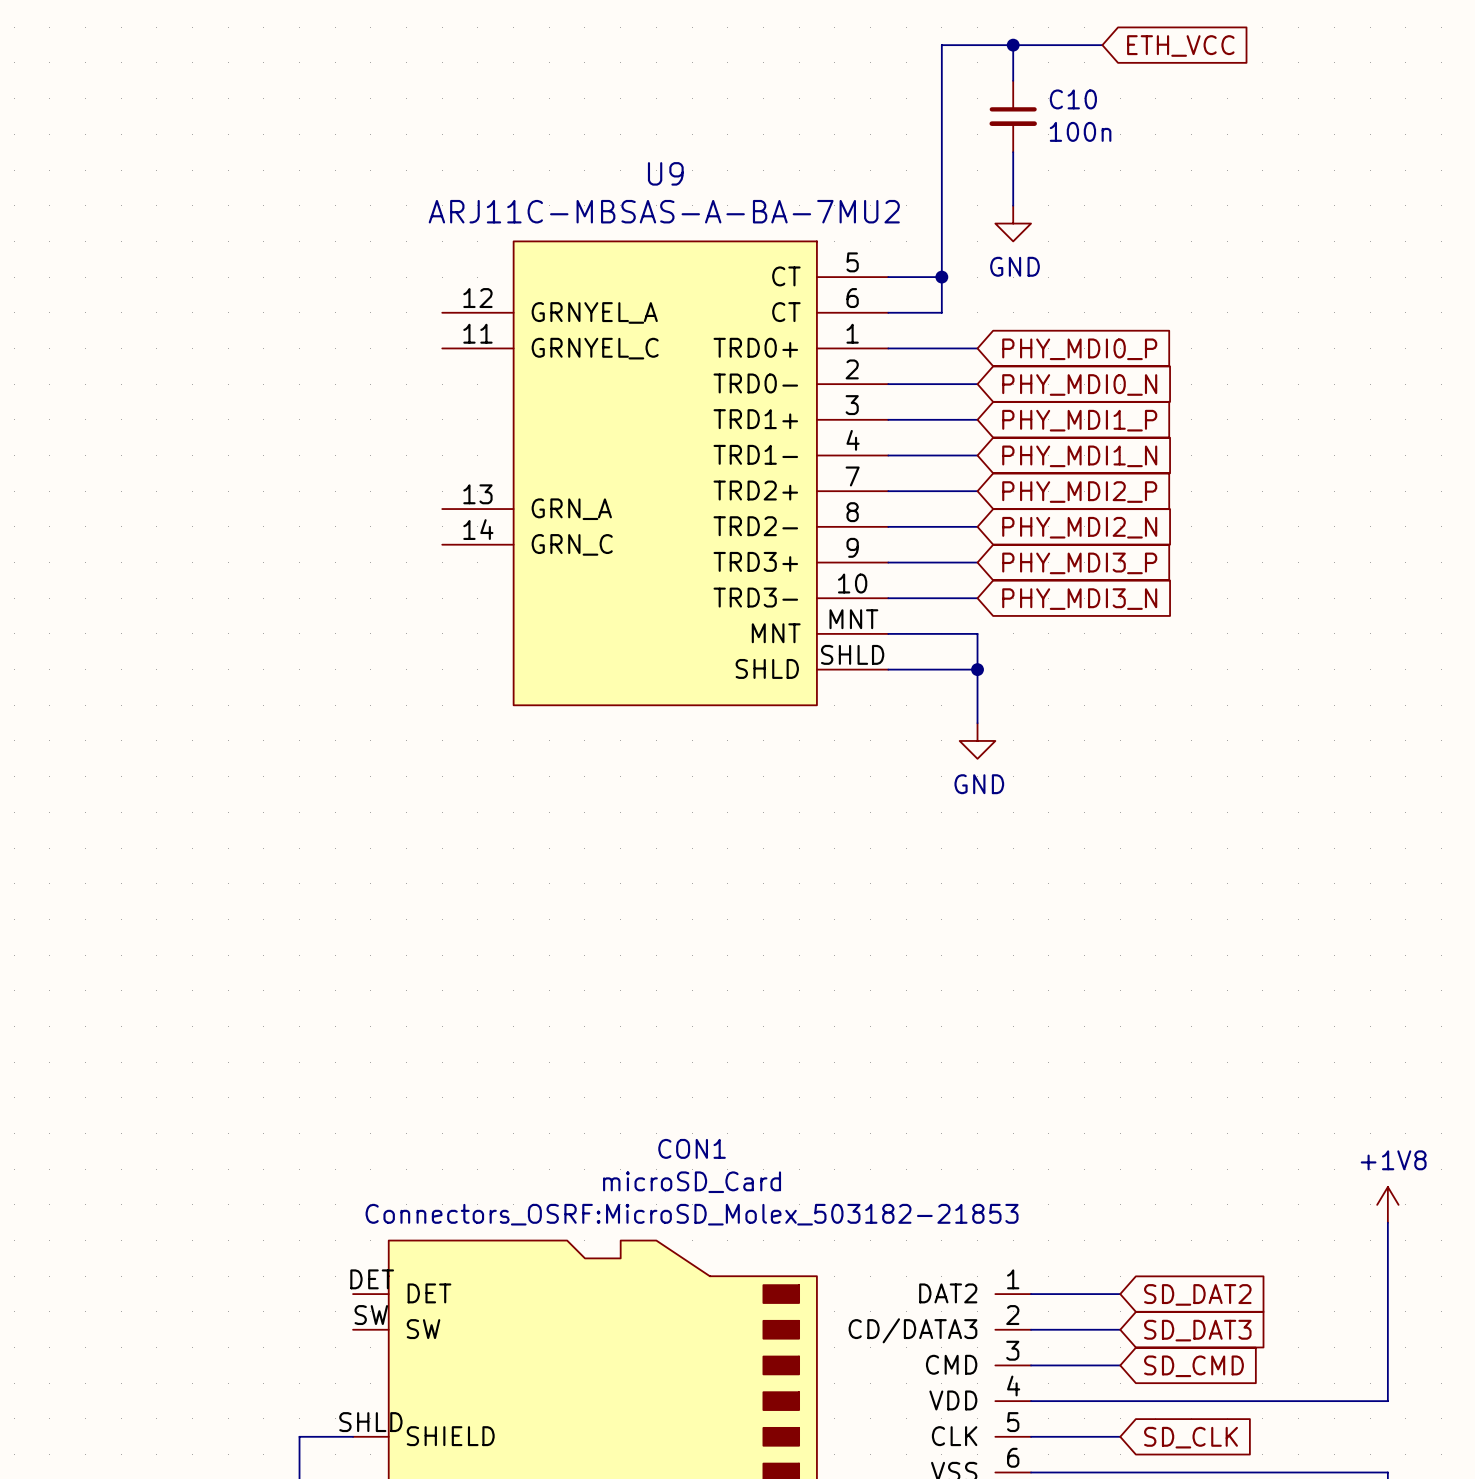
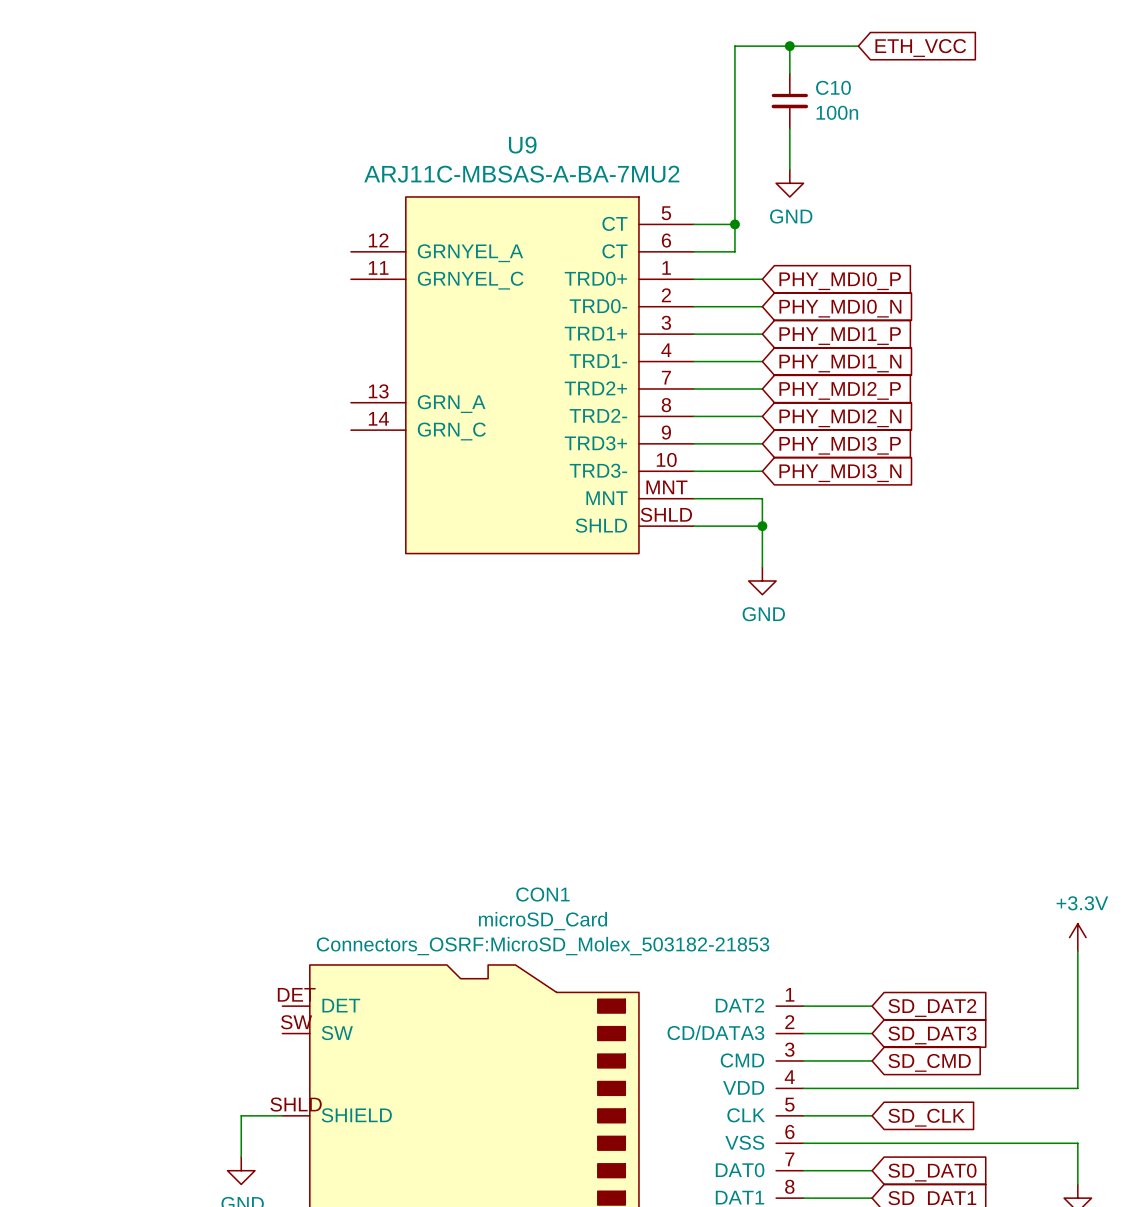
power symbol: +1V8 (1387, 1204) -> +3.3V (1077, 937)

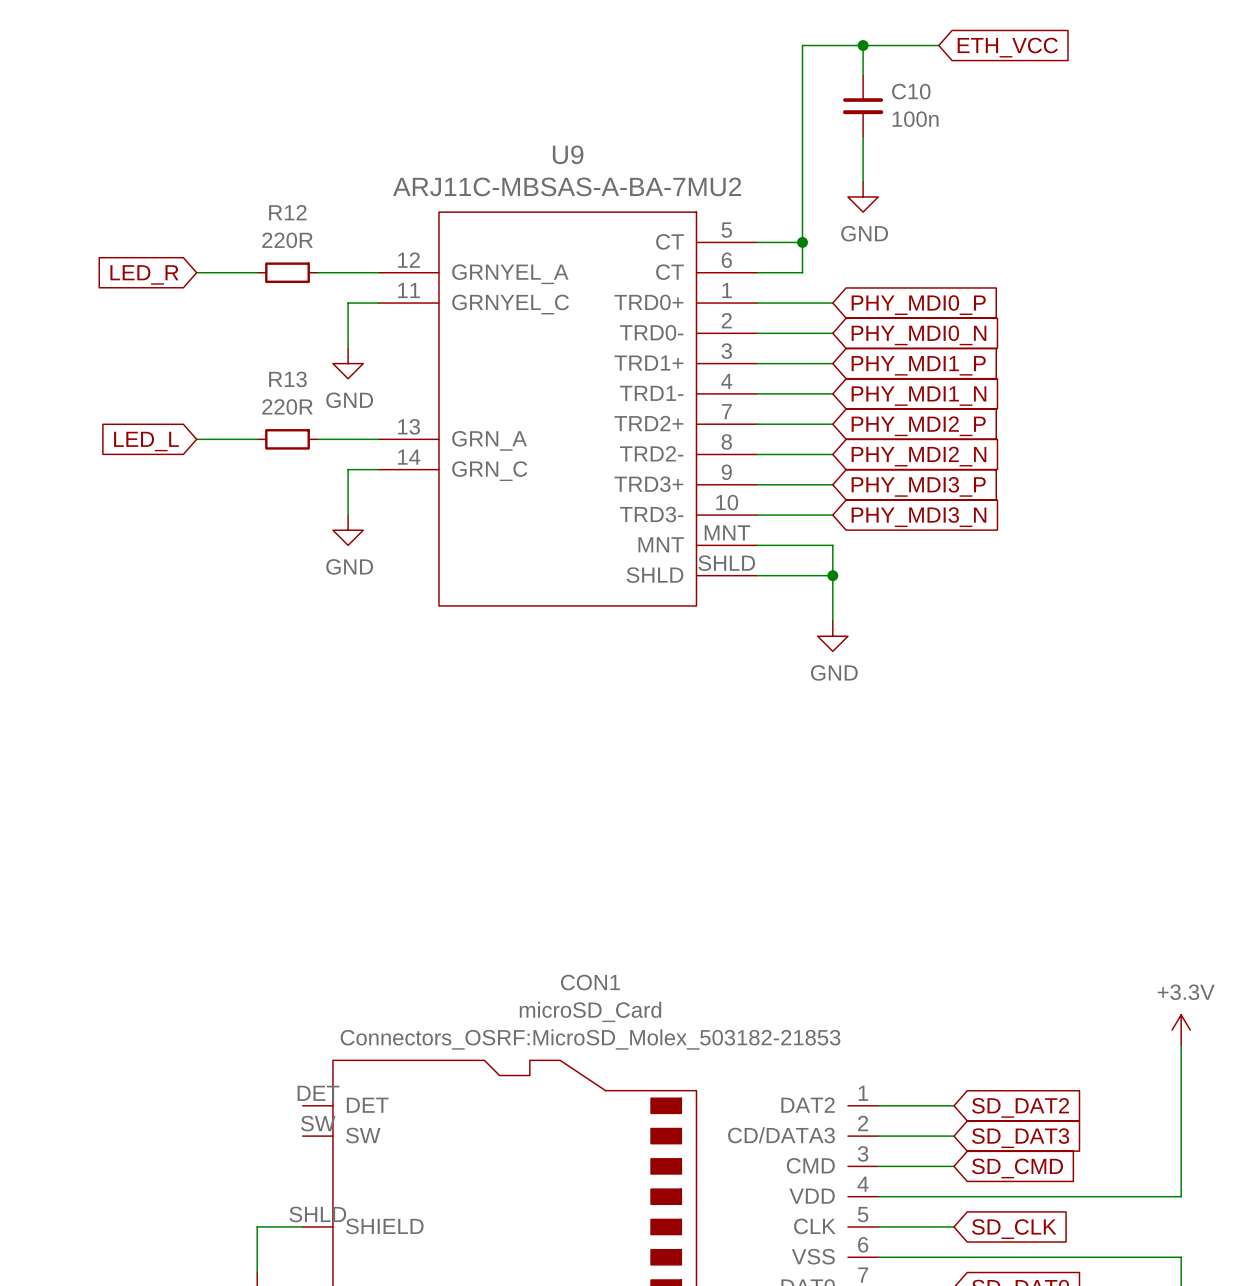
wire: none -> (196, 272) (257, 272)
R12: none -> 220R (287, 272)
wire: none -> (317, 272) (378, 272)
global label: none -> LED_R (144, 274)
wire: none -> (378, 303) (348, 303) (348, 348)
power symbol: none -> GND (348, 363)
wire: none -> (196, 439) (257, 439)
R13: none -> 220R (287, 439)
wire: none -> (317, 439) (378, 439)
global label: none -> LED_L (146, 441)
wire: none -> (378, 469) (348, 469) (348, 515)
power symbol: none -> GND (348, 530)

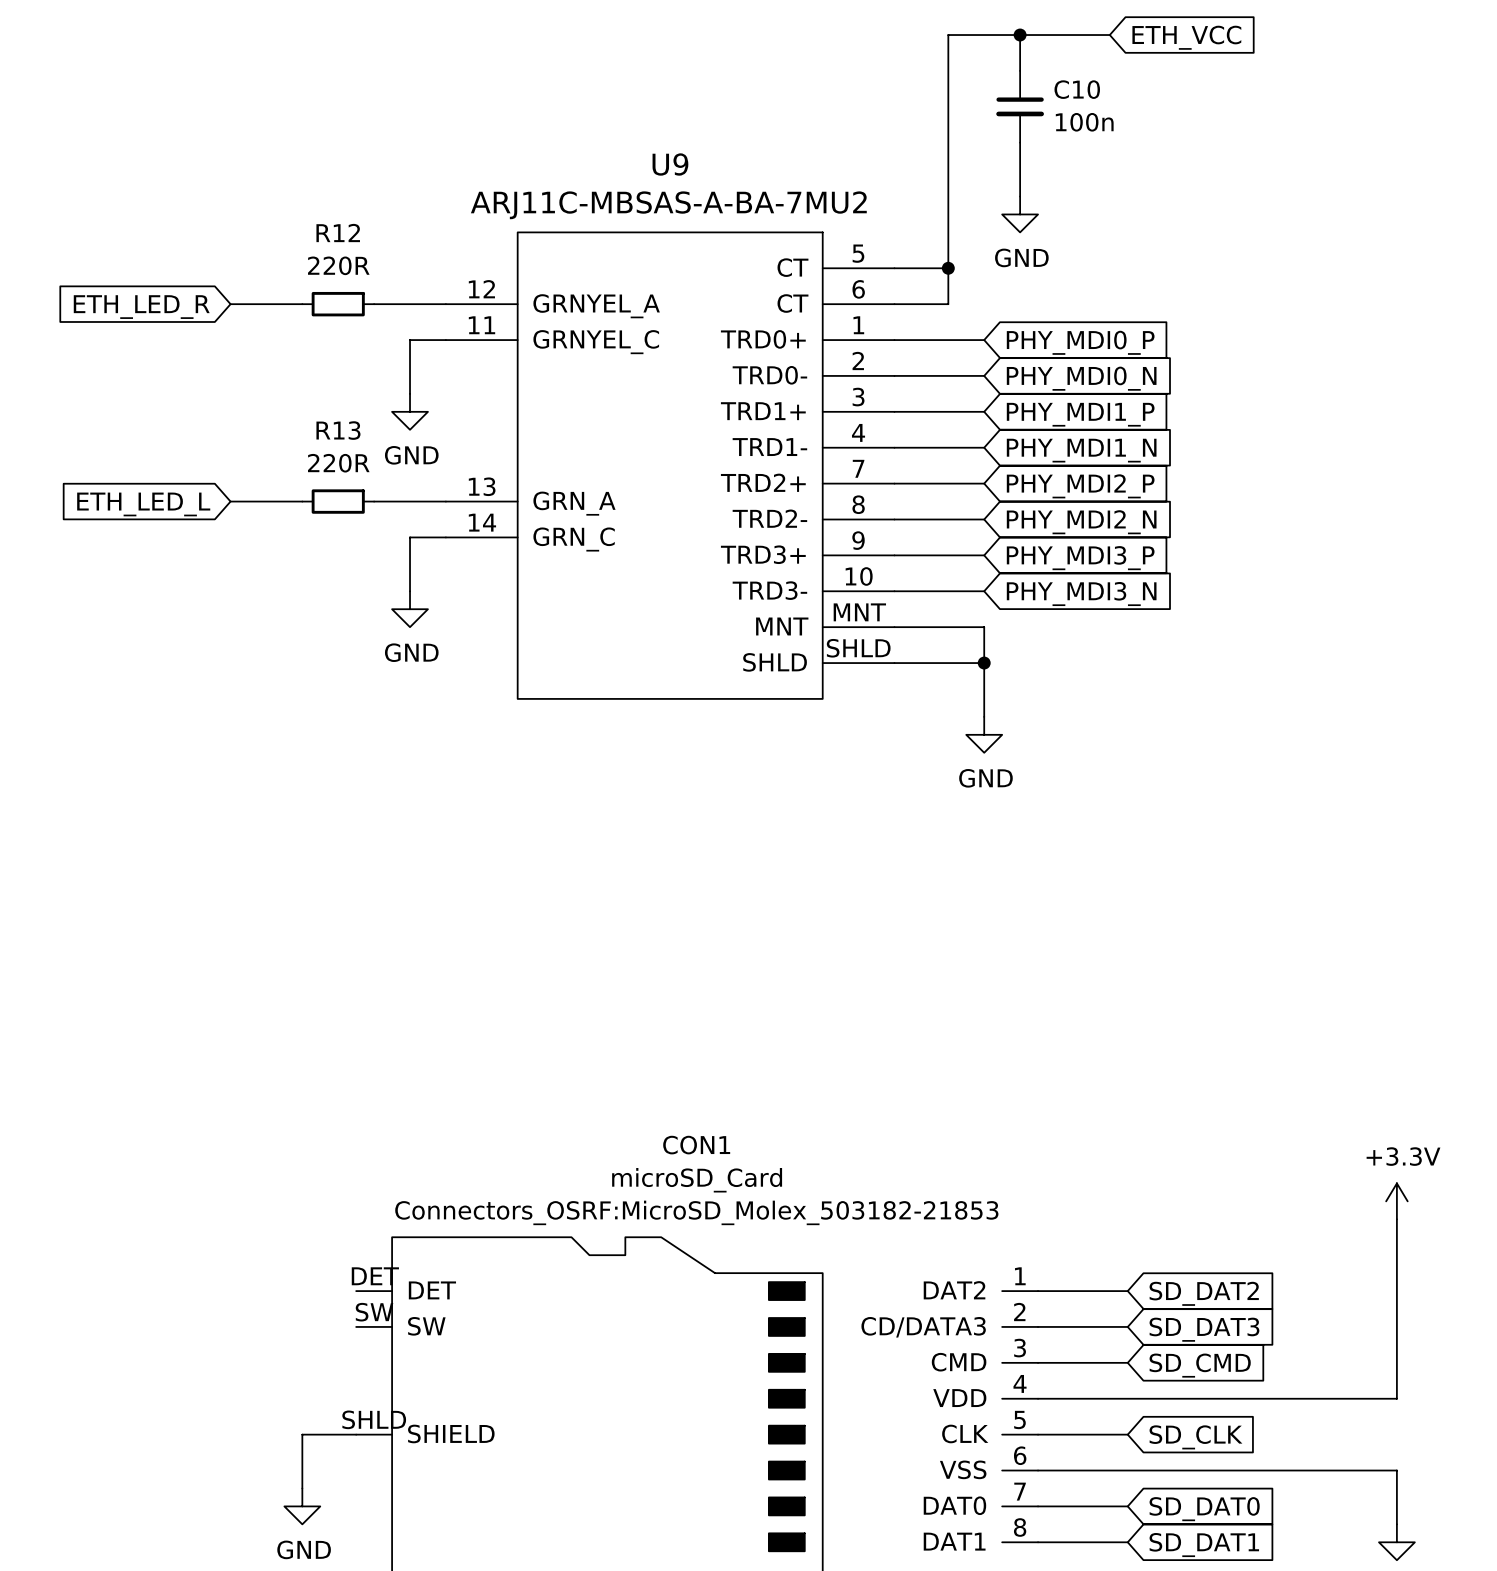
global label: LED_R (144, 274) -> ETH_LED_R (141, 307)
global label: LED_L (146, 441) -> ETH_LED_L (143, 504)

